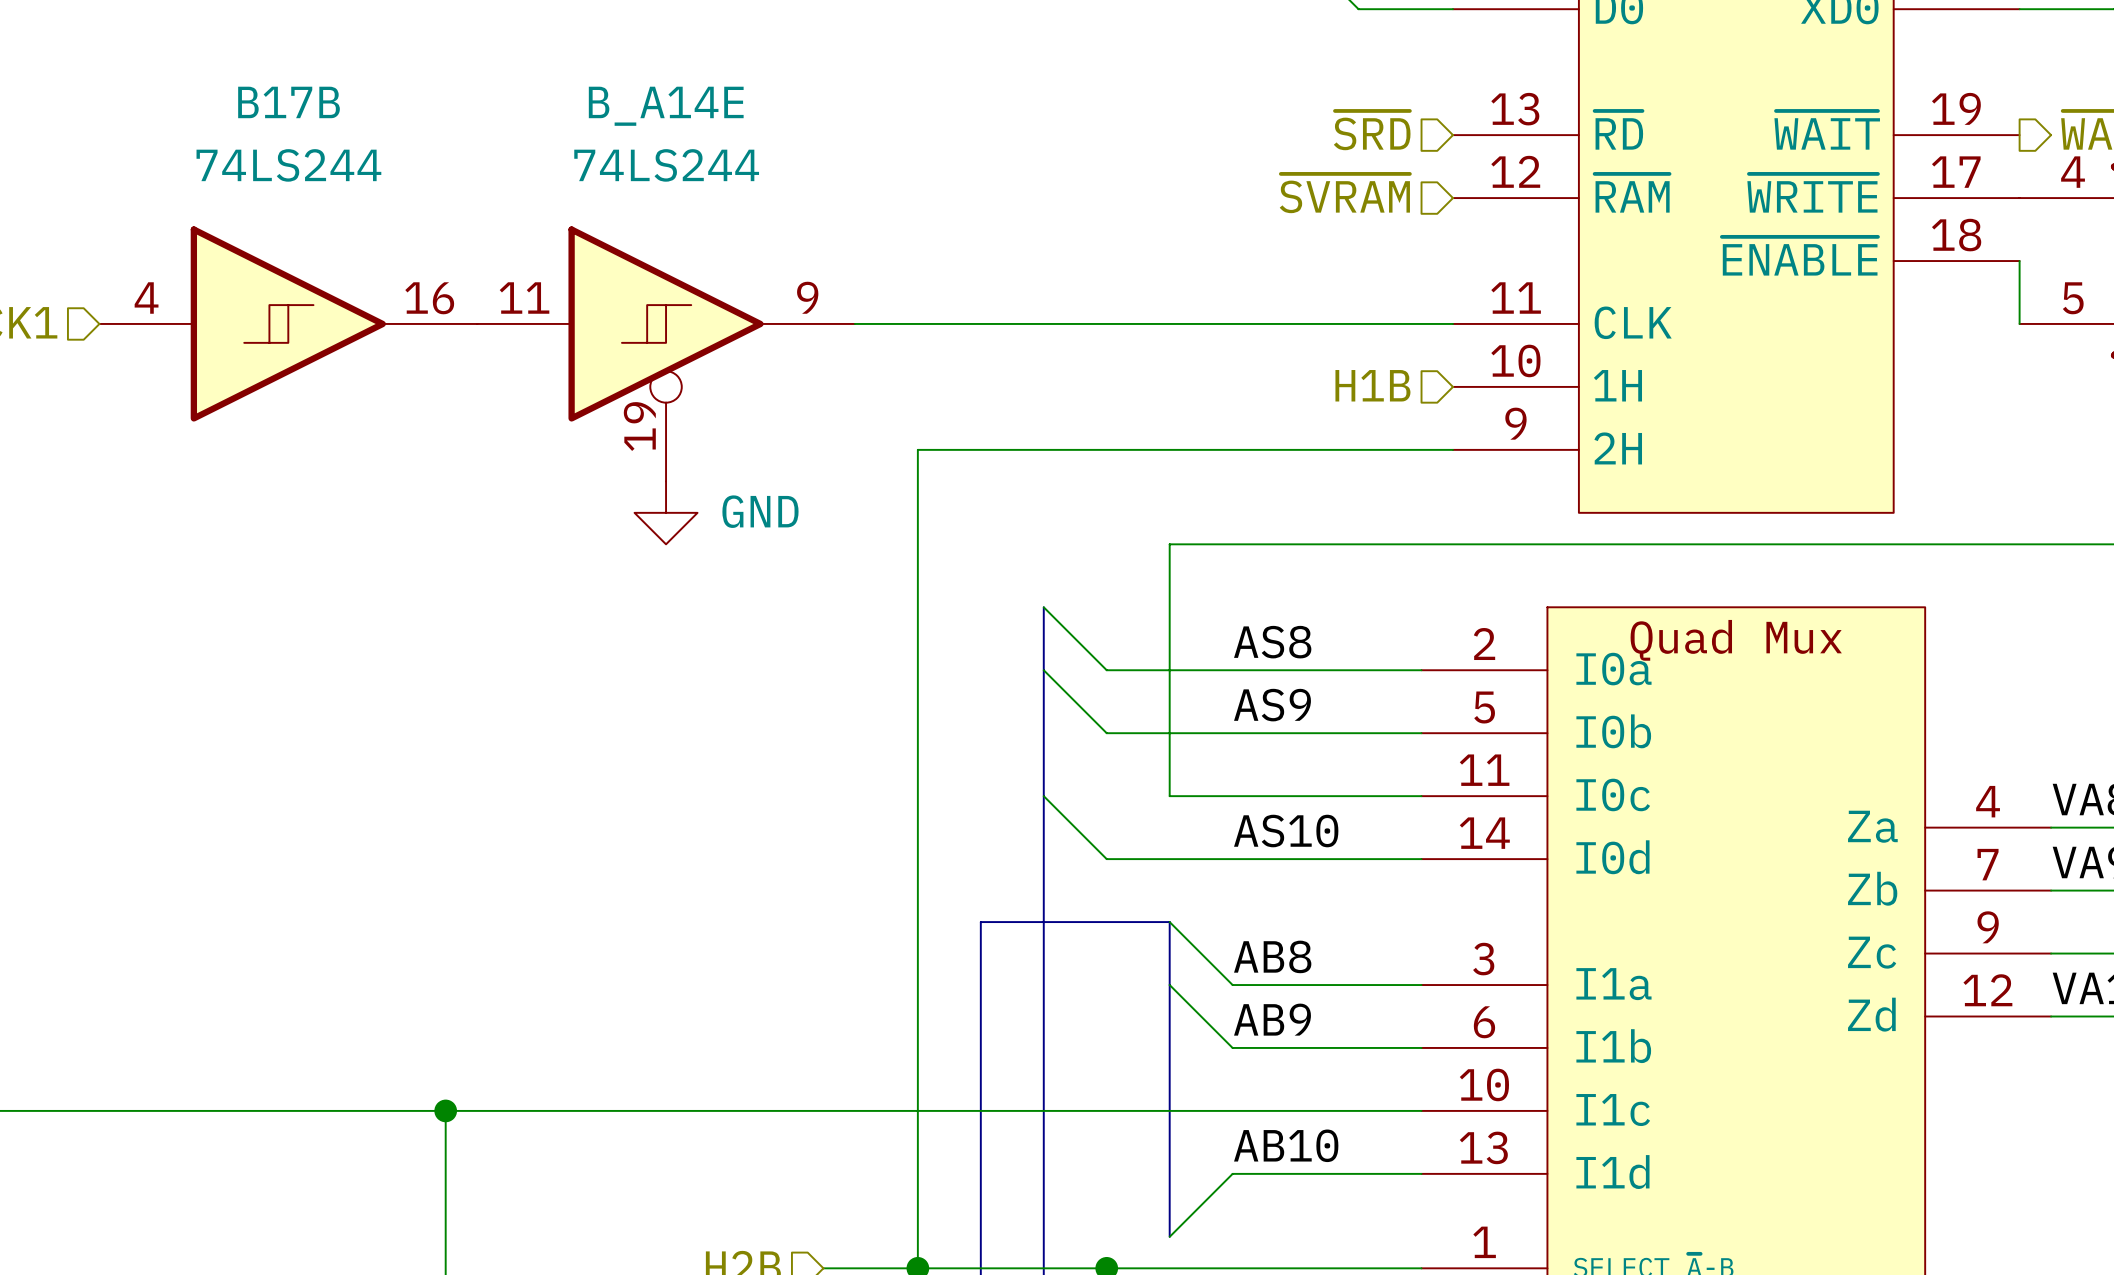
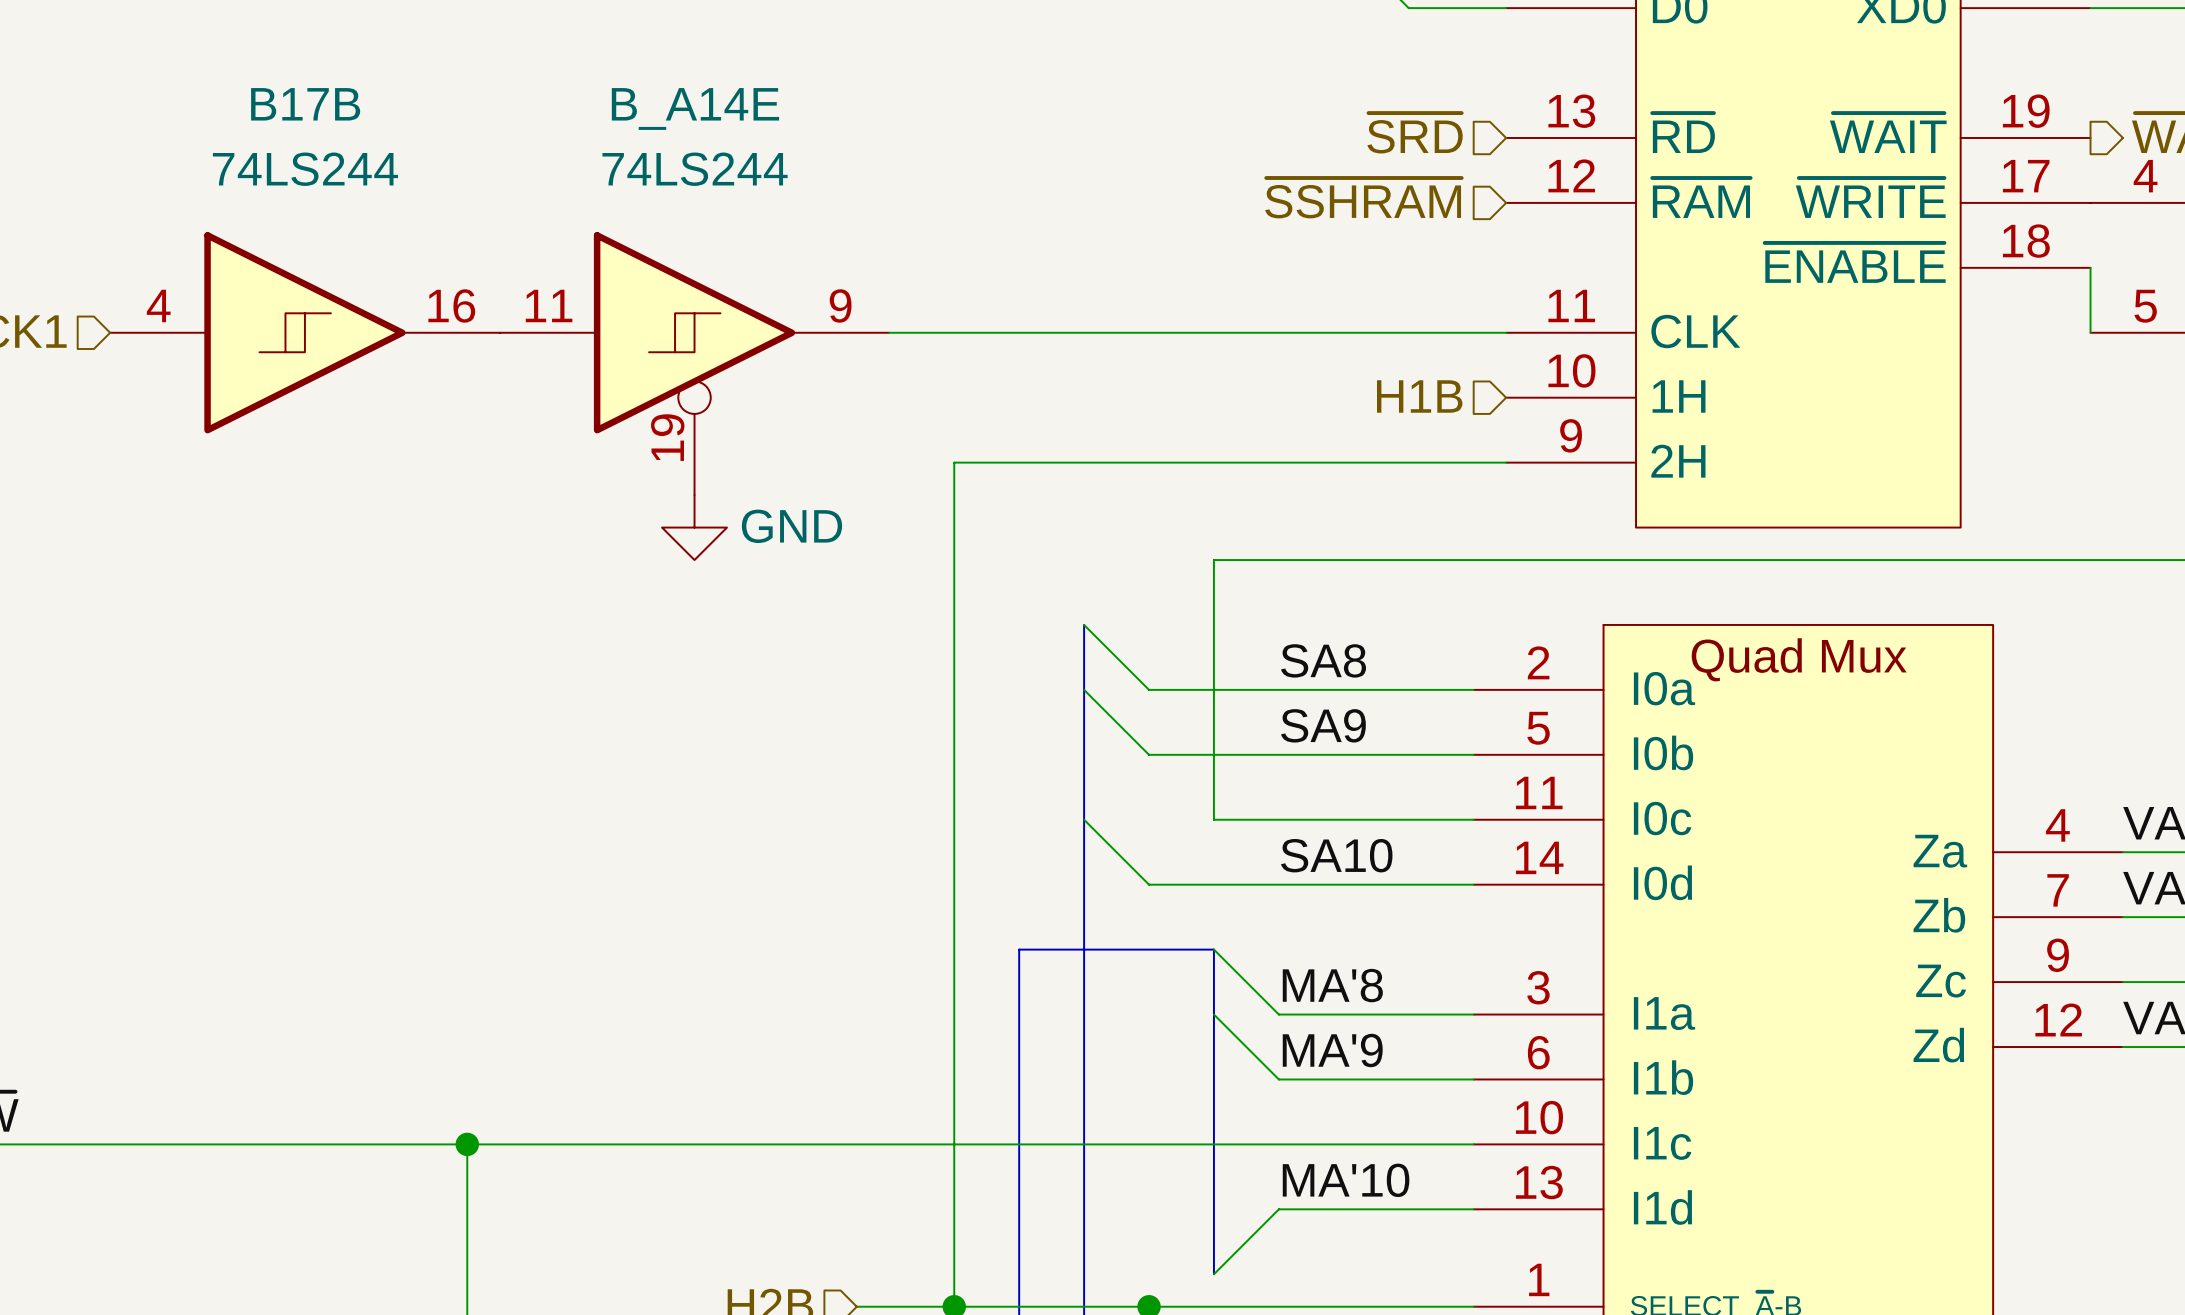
hierarchical label: ~{SVRAM} (1344, 193) -> ~{SSHRAM} (1363, 198)
label: AS8 (1272, 642) -> SA8 (1323, 660)
label: AS9 (1272, 705) -> SA9 (1323, 725)
label: AS10 (1286, 831) -> SA10 (1336, 855)
label: AB8 (1272, 956) -> MA'8 (1332, 985)
label: AB9 (1272, 1019) -> MA'9 (1332, 1050)
label: AB10 (1286, 1145) -> MA'10 (1346, 1180)

